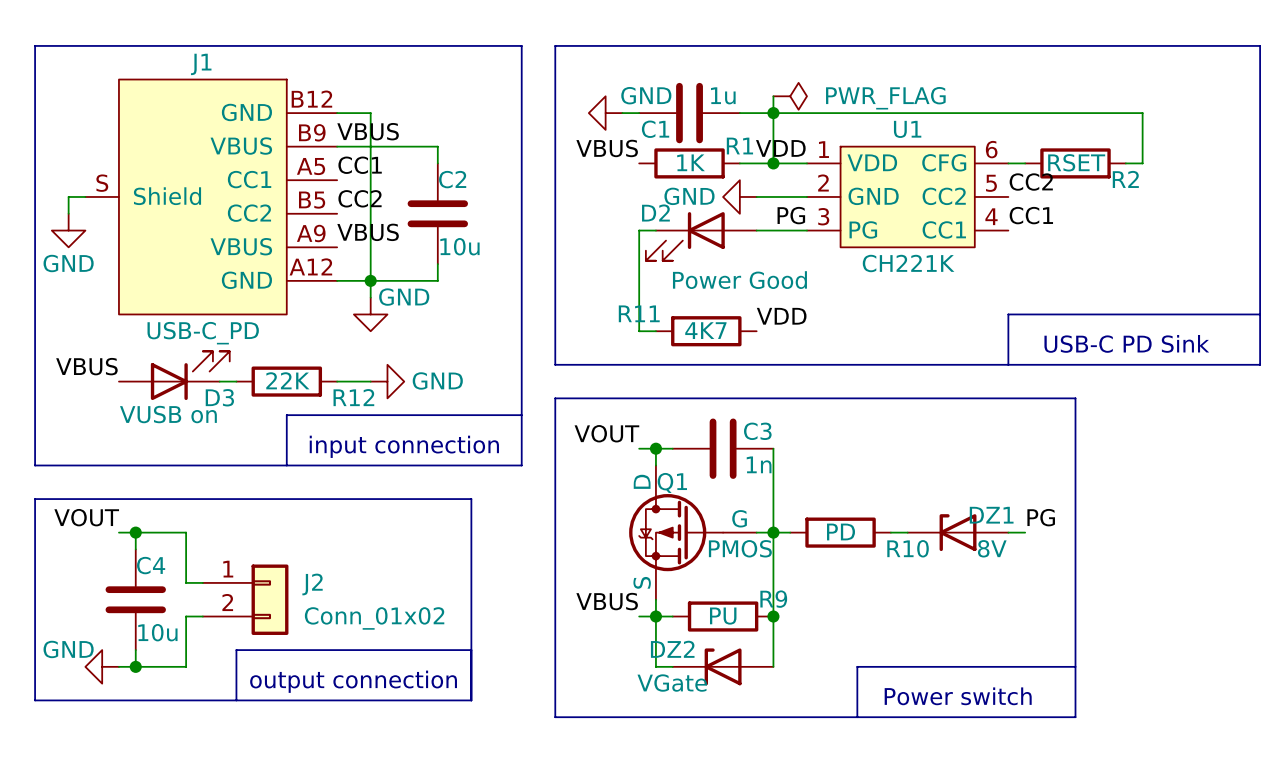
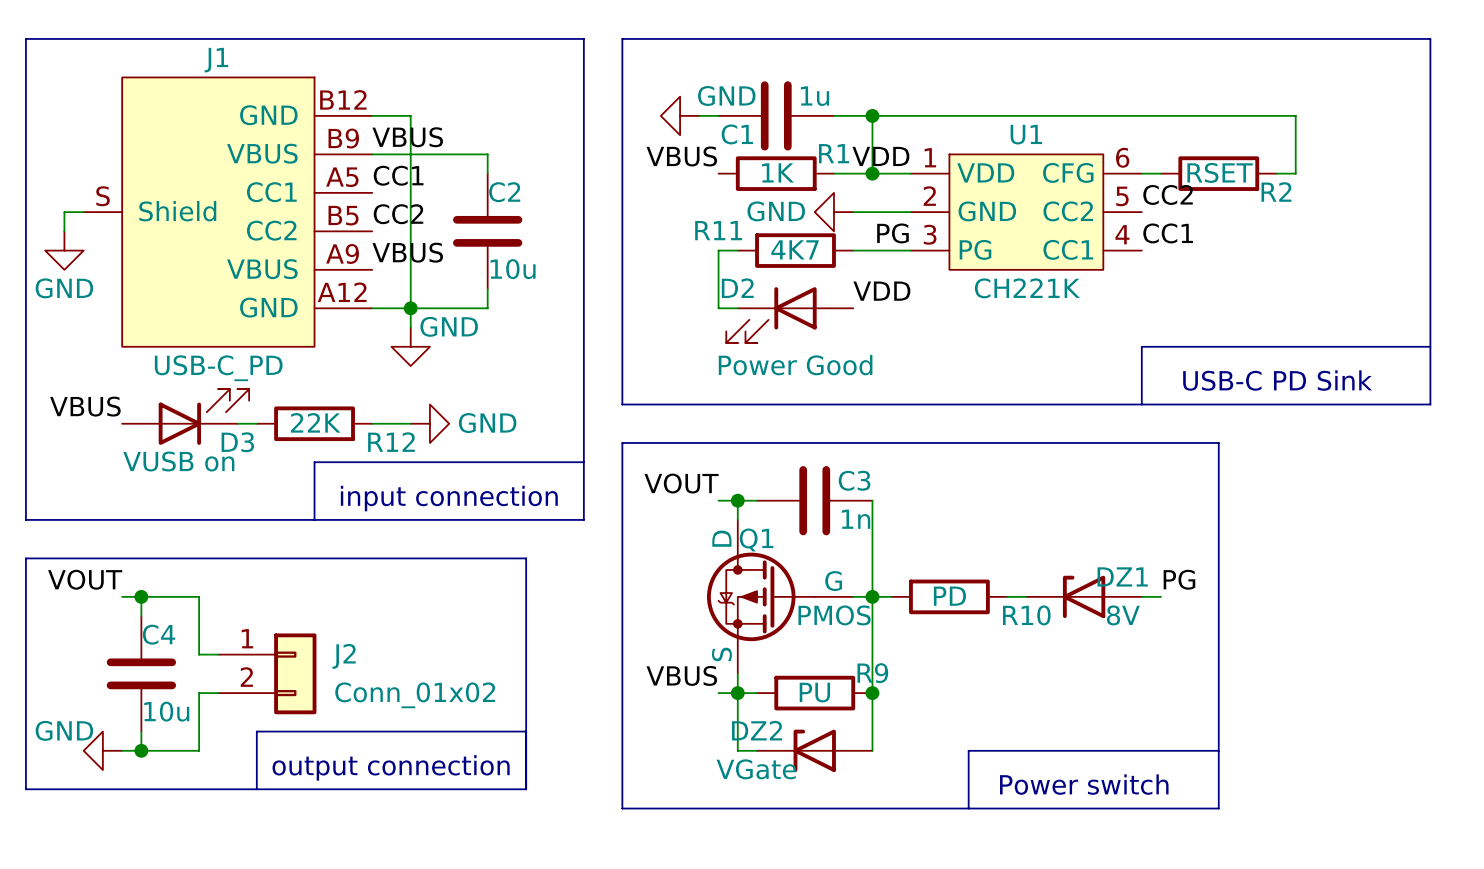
wire: (773, 96) (773, 113) -> none
power symbol: PWR_FLAG (790, 96) -> none
D2 position: (701, 236) -> (789, 315)
wire: (639, 280) (639, 331) (655, 331) -> (718, 308) (737, 308)
D2 value position: Power Good (739, 280) -> Power Good (795, 365)
label position: VDD (781, 316) -> VDD (881, 291)
R11 position: (706, 331) -> (795, 250)

